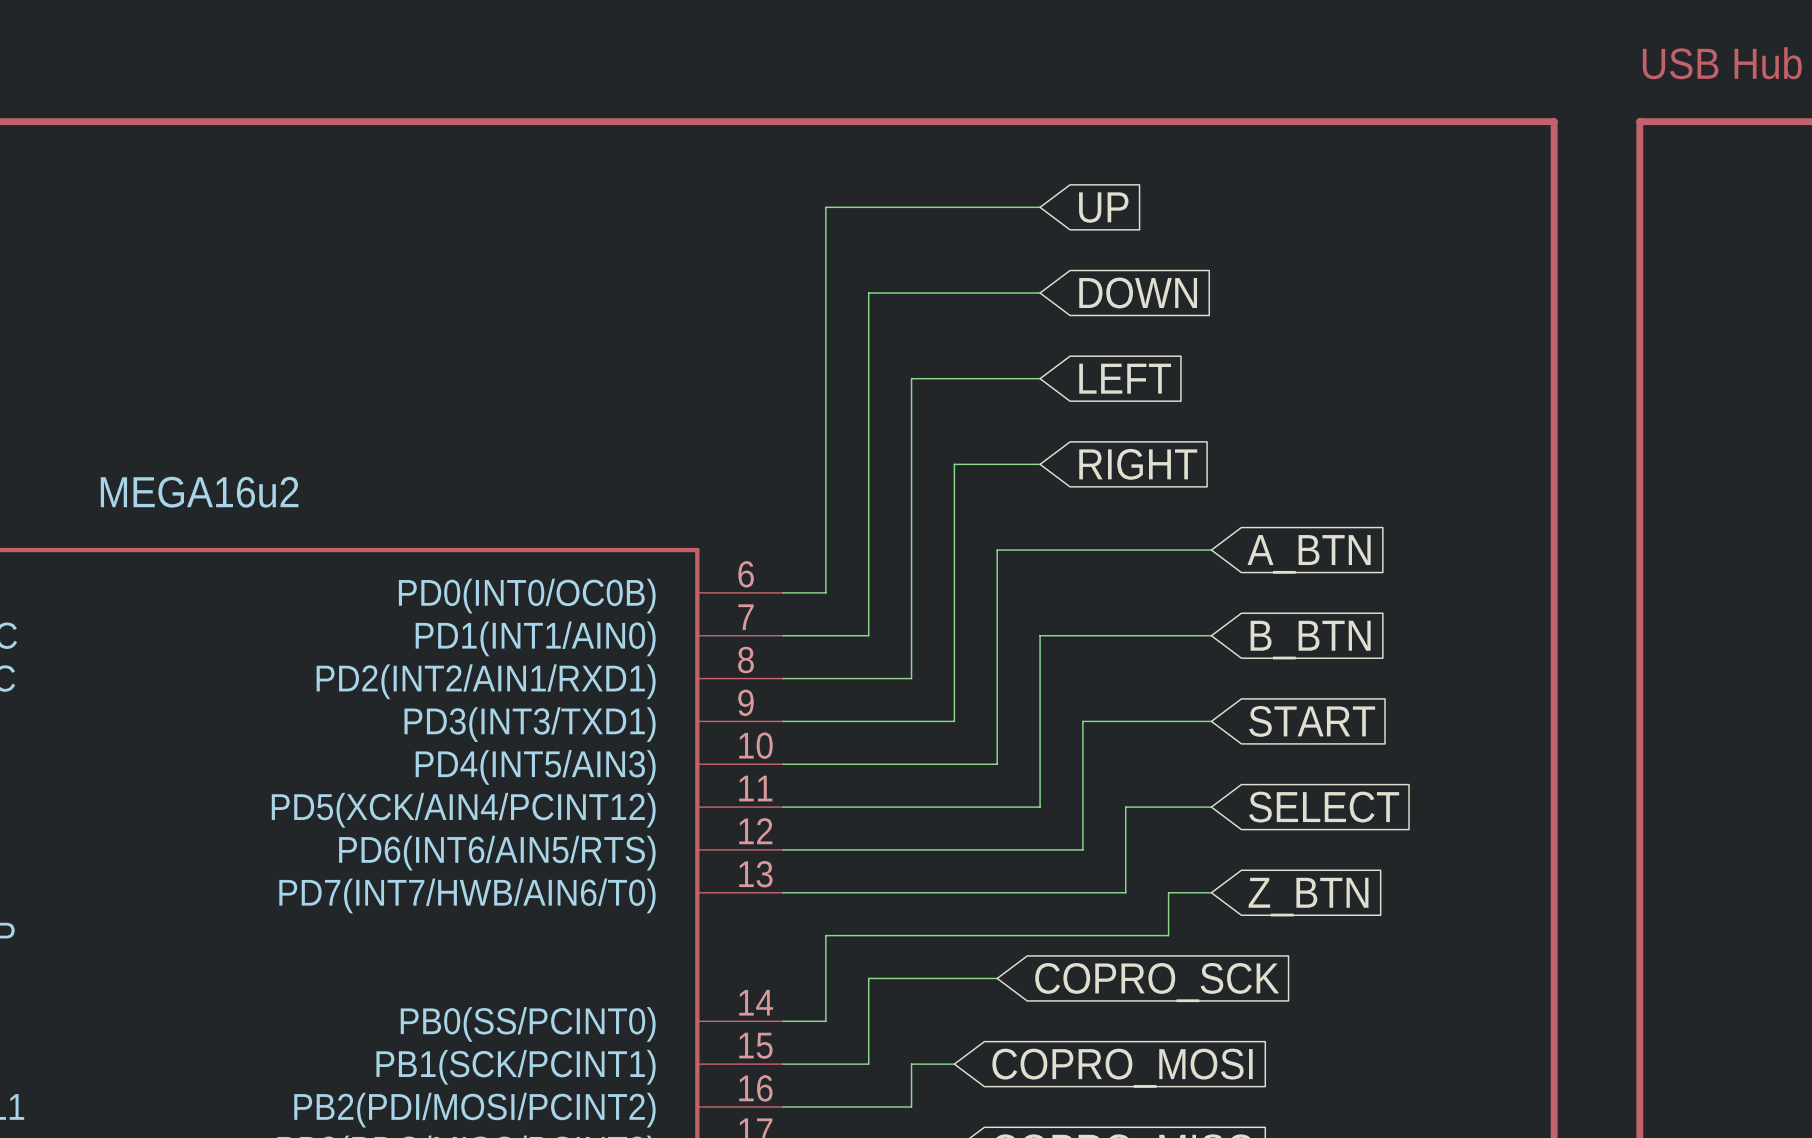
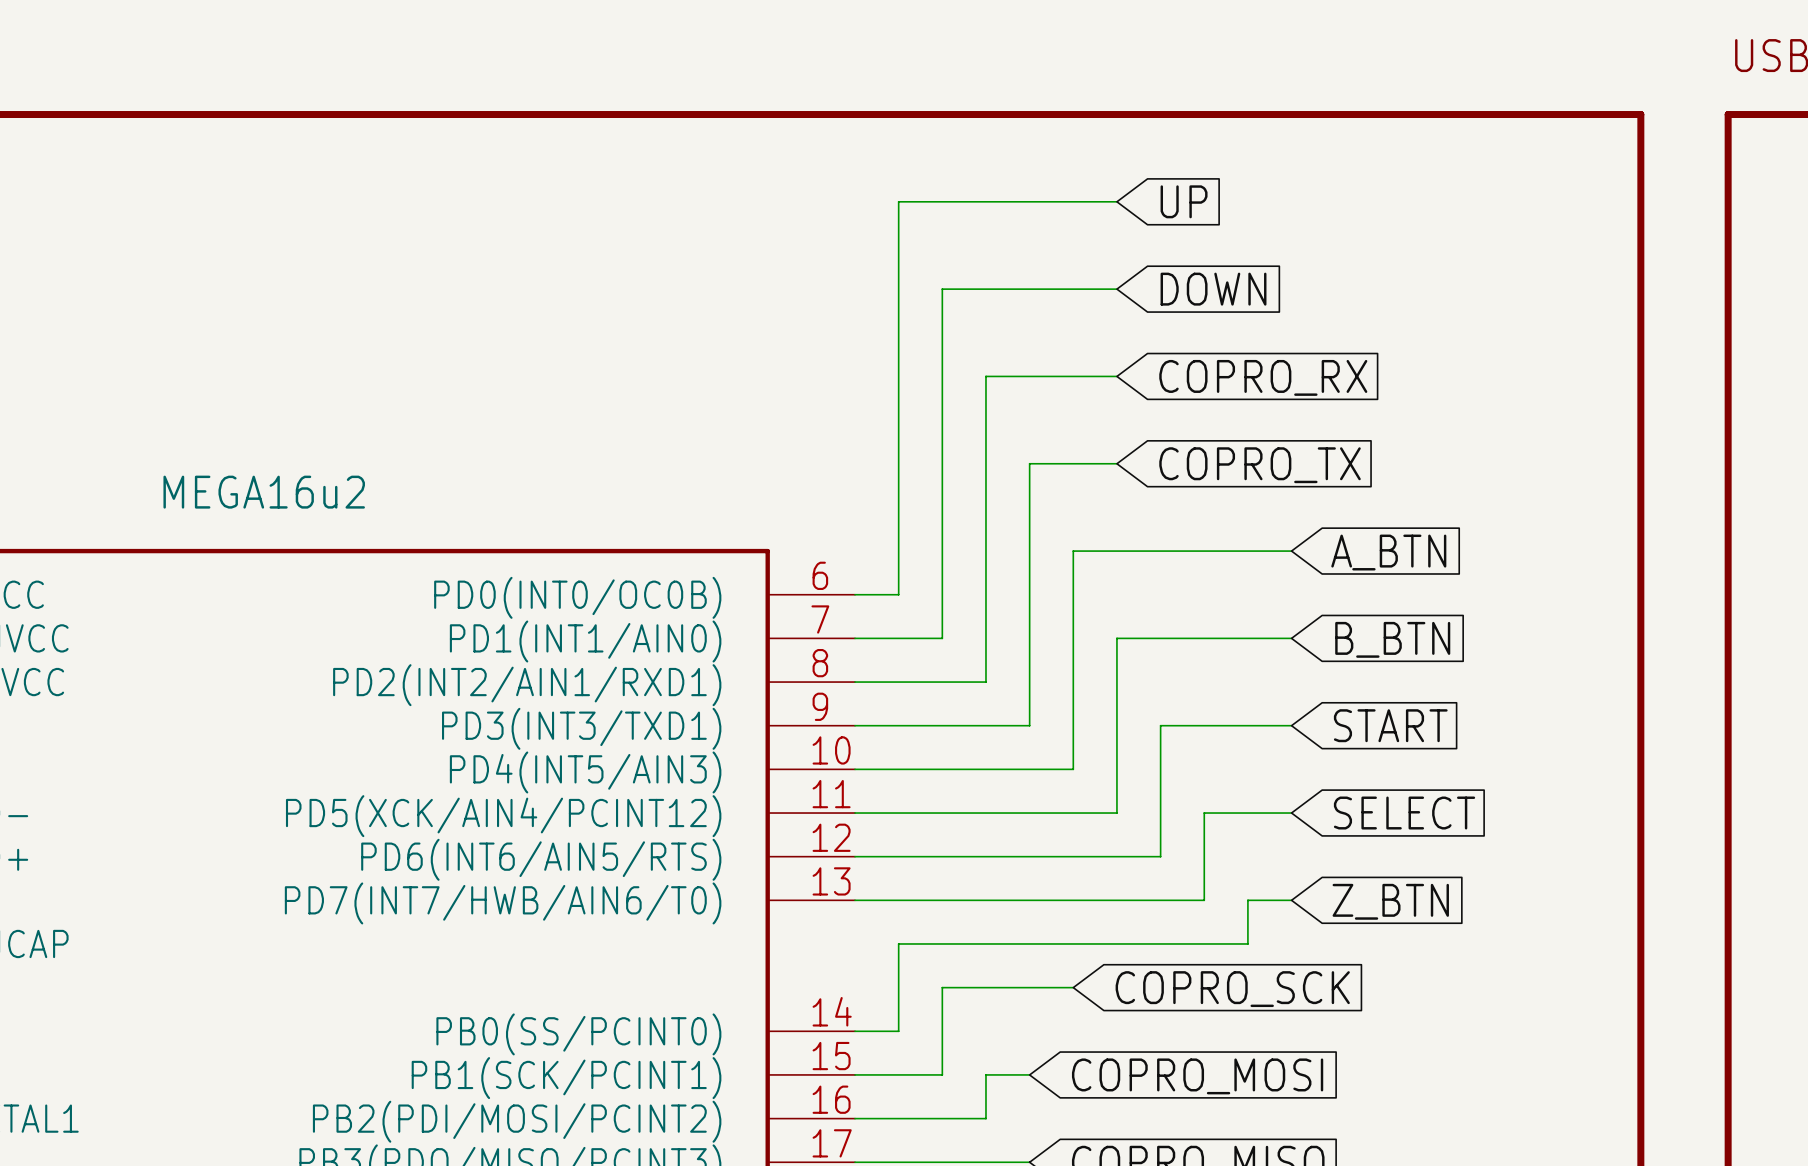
global label: LEFT (1125, 378) -> COPRO_RX (1263, 377)
global label: RIGHT (1138, 464) -> COPRO_TX (1260, 465)

